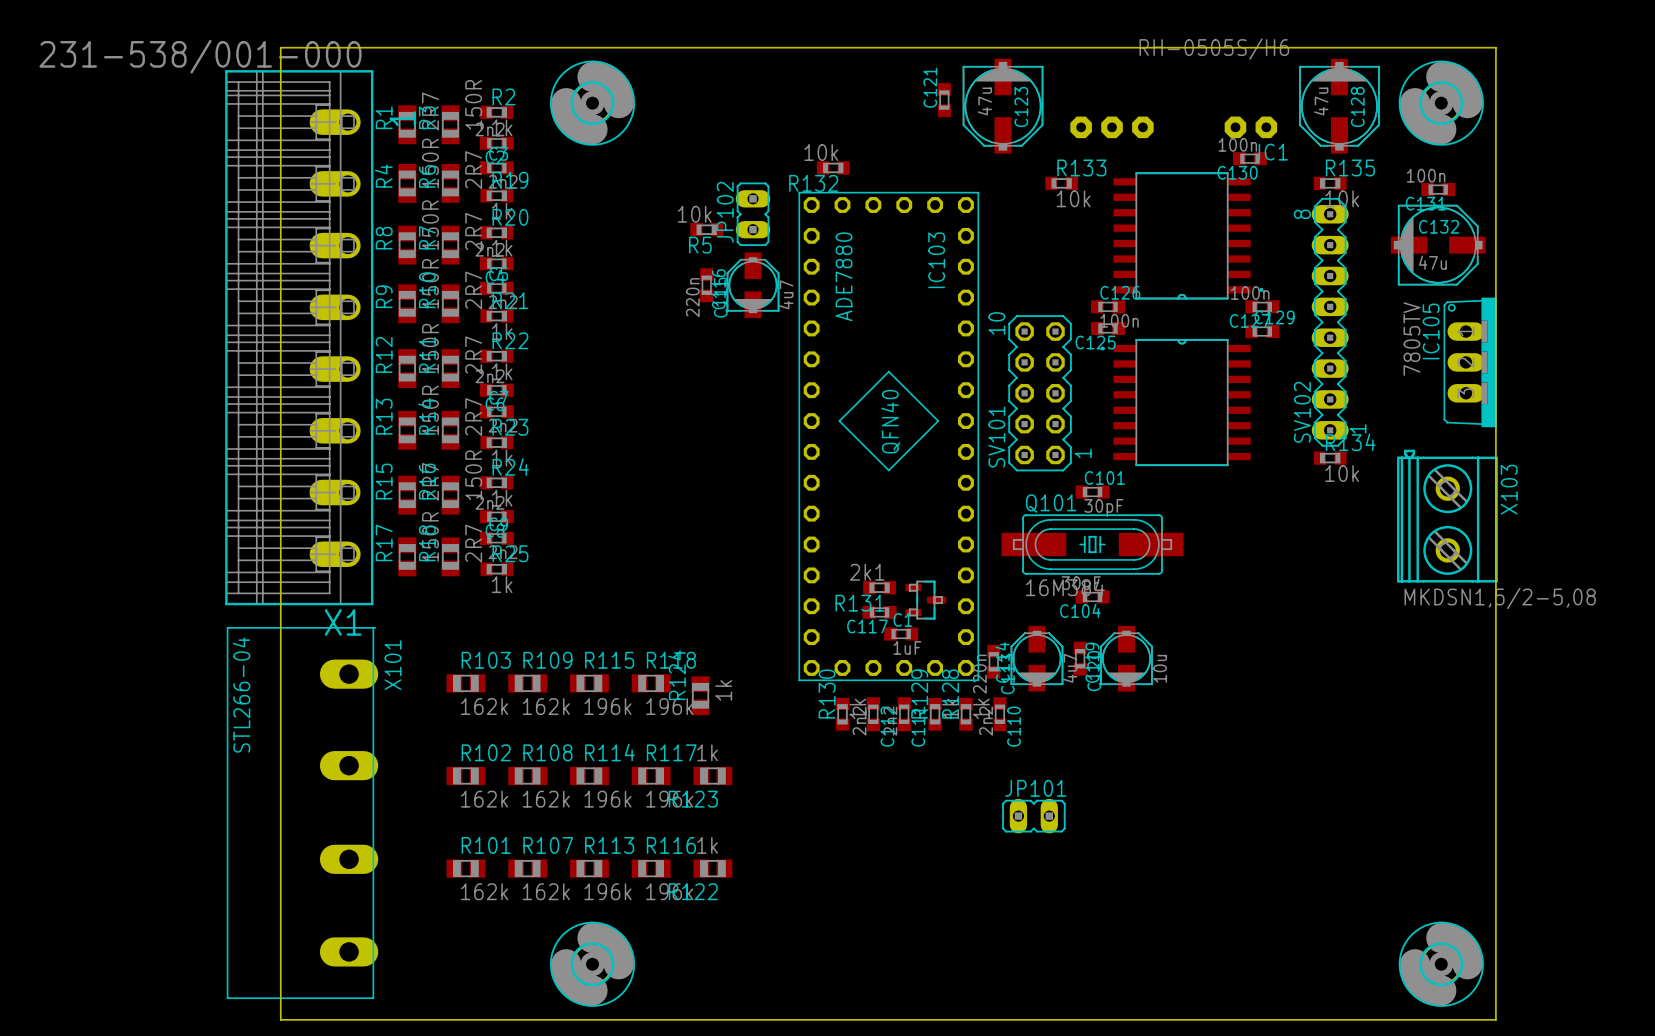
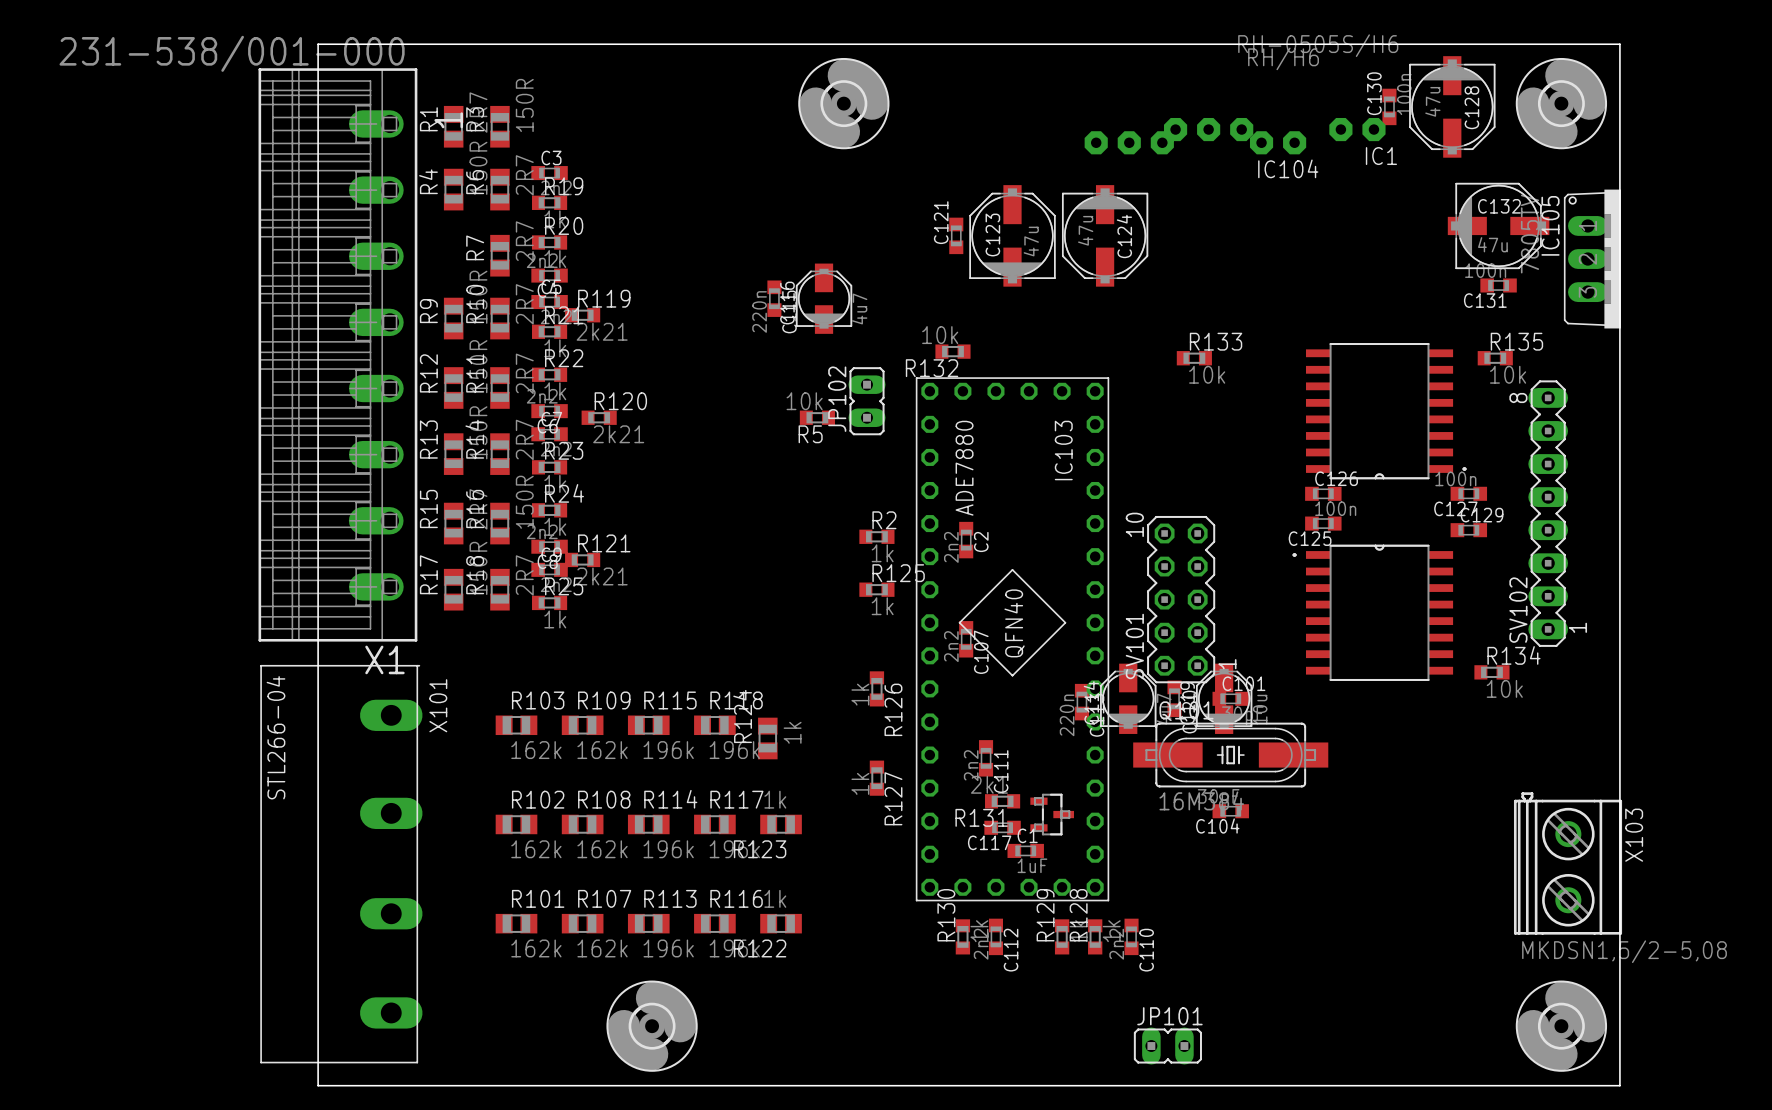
C121 position: (944, 100) -> (956, 235)
part position: (592, 103) -> (843, 103)
C123 rotation: 0° (1003, 106) -> 180° (1012, 235)
C123 position: (1003, 106) -> (1012, 235)
R2 position: (496, 112) -> (876, 536)
IC104: none -> RH/H6 (1195, 142)
C2 rotation: 0° (496, 143) -> 90° clockwise (966, 540)
C2 position: (496, 143) -> (966, 540)
C130 rotation: 0° (1249, 158) -> 90° clockwise (1389, 106)
C130 position: (1249, 158) -> (1389, 106)
R132 position: (833, 167) -> (952, 351)
R133 position: (1061, 183) -> (1194, 358)
R135 position: (1330, 183) -> (1495, 358)
C131 position: (1438, 189) -> (1498, 285)
JP102 position: (753, 214) -> (867, 401)
C124: none -> 47u (1105, 235)
R5 position: (706, 229) -> (817, 417)
part: (1188, 235) -> none
R8: 150R (407, 245) -> none
C132 position: (1438, 245) -> (1498, 225)
R119: none -> 2k21 (582, 315)
C126 position: (1107, 306) -> (1323, 493)
C127 position: (1262, 306) -> (1468, 493)
SV102 position: (1330, 322) -> (1548, 513)
C125 position: (1107, 328) -> (1323, 523)
C129 position: (1262, 331) -> (1468, 530)
IC105 position: (1470, 362) -> (1592, 259)
part: none -> (1386, 411)
SV101 position: (1040, 393) -> (1181, 599)
R120: none -> 2k21 (599, 417)
part: (1175, 402) -> none
IC103 position: (888, 436) -> (1012, 639)
R134 position: (1330, 458) -> (1491, 672)
C101 position: (1092, 492) -> (1230, 698)
X103 position: (1447, 516) -> (1568, 863)
R121: none -> 2k21 (582, 559)
Q101 position: (1092, 544) -> (1230, 755)
R125: none -> 1k (876, 589)
part: none -> (1372, 612)
R131 position: (879, 587) -> (1002, 801)
C104 position: (1092, 596) -> (1230, 811)
part position: (925, 600) -> (1052, 814)
C107: none -> 2n2 (966, 639)
C117 position: (879, 612) -> (1002, 827)
C1 position: (901, 634) -> (1025, 850)
R126: none -> 1k (876, 688)
R130 position: (842, 714) -> (962, 936)
C112 position: (873, 714) -> (995, 936)
R129 position: (935, 714) -> (1062, 936)
R128 position: (965, 714) -> (1095, 936)
C110 position: (999, 714) -> (1131, 936)
R127: none -> 1k (876, 778)
JP101 position: (1033, 816) -> (1167, 1046)

